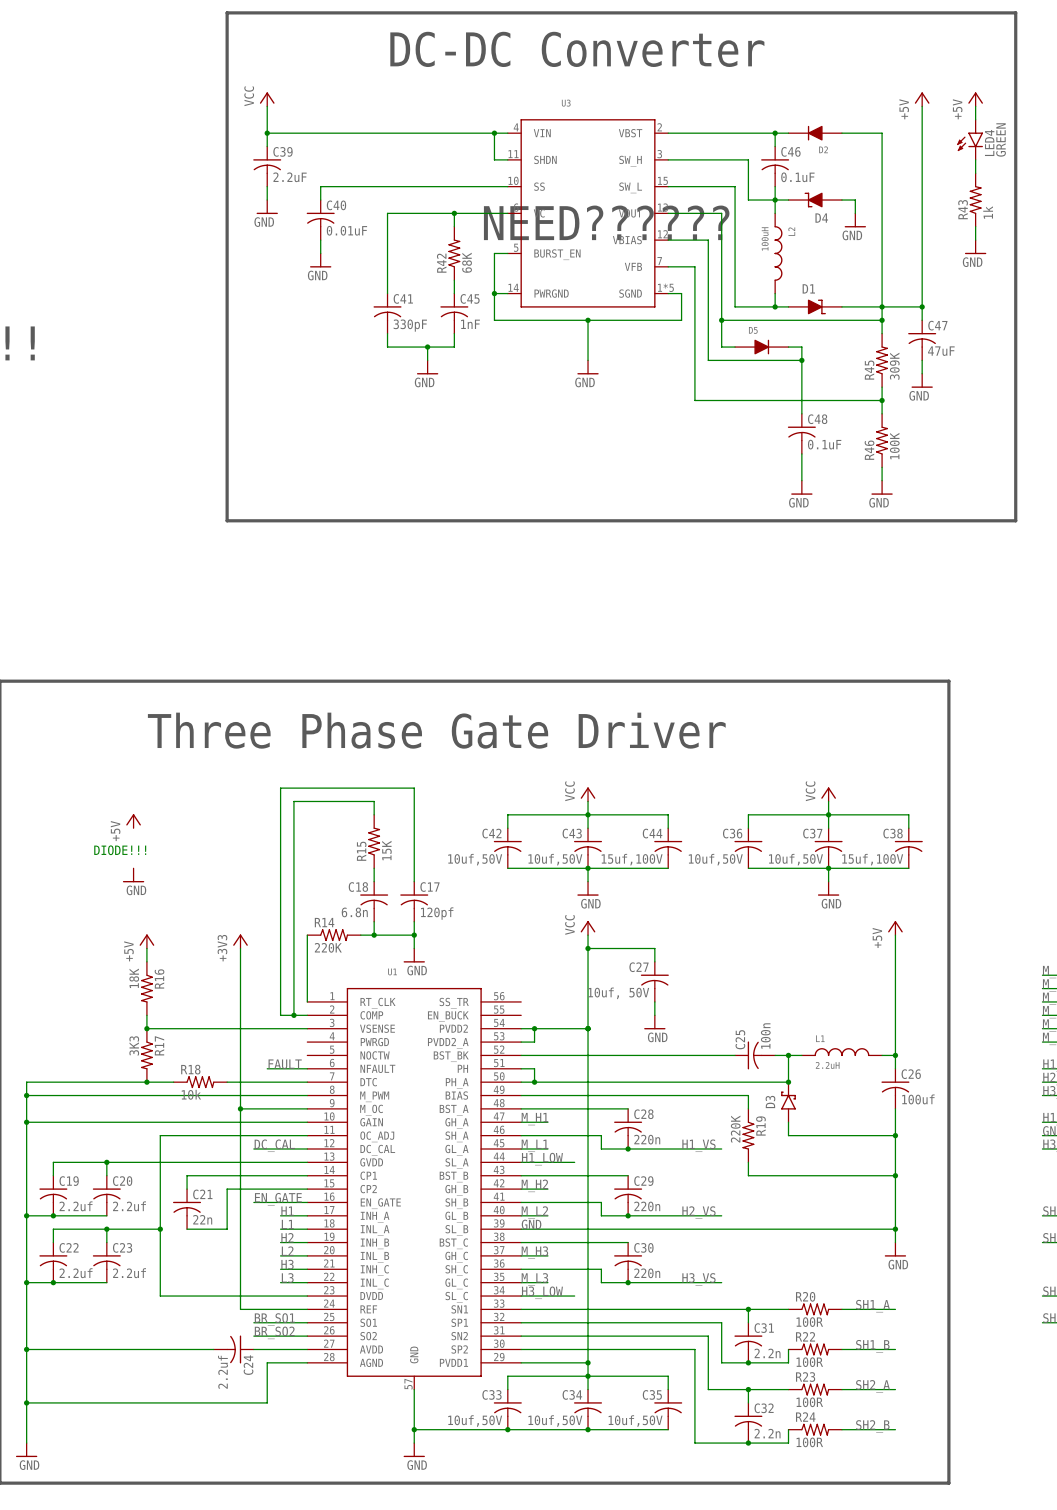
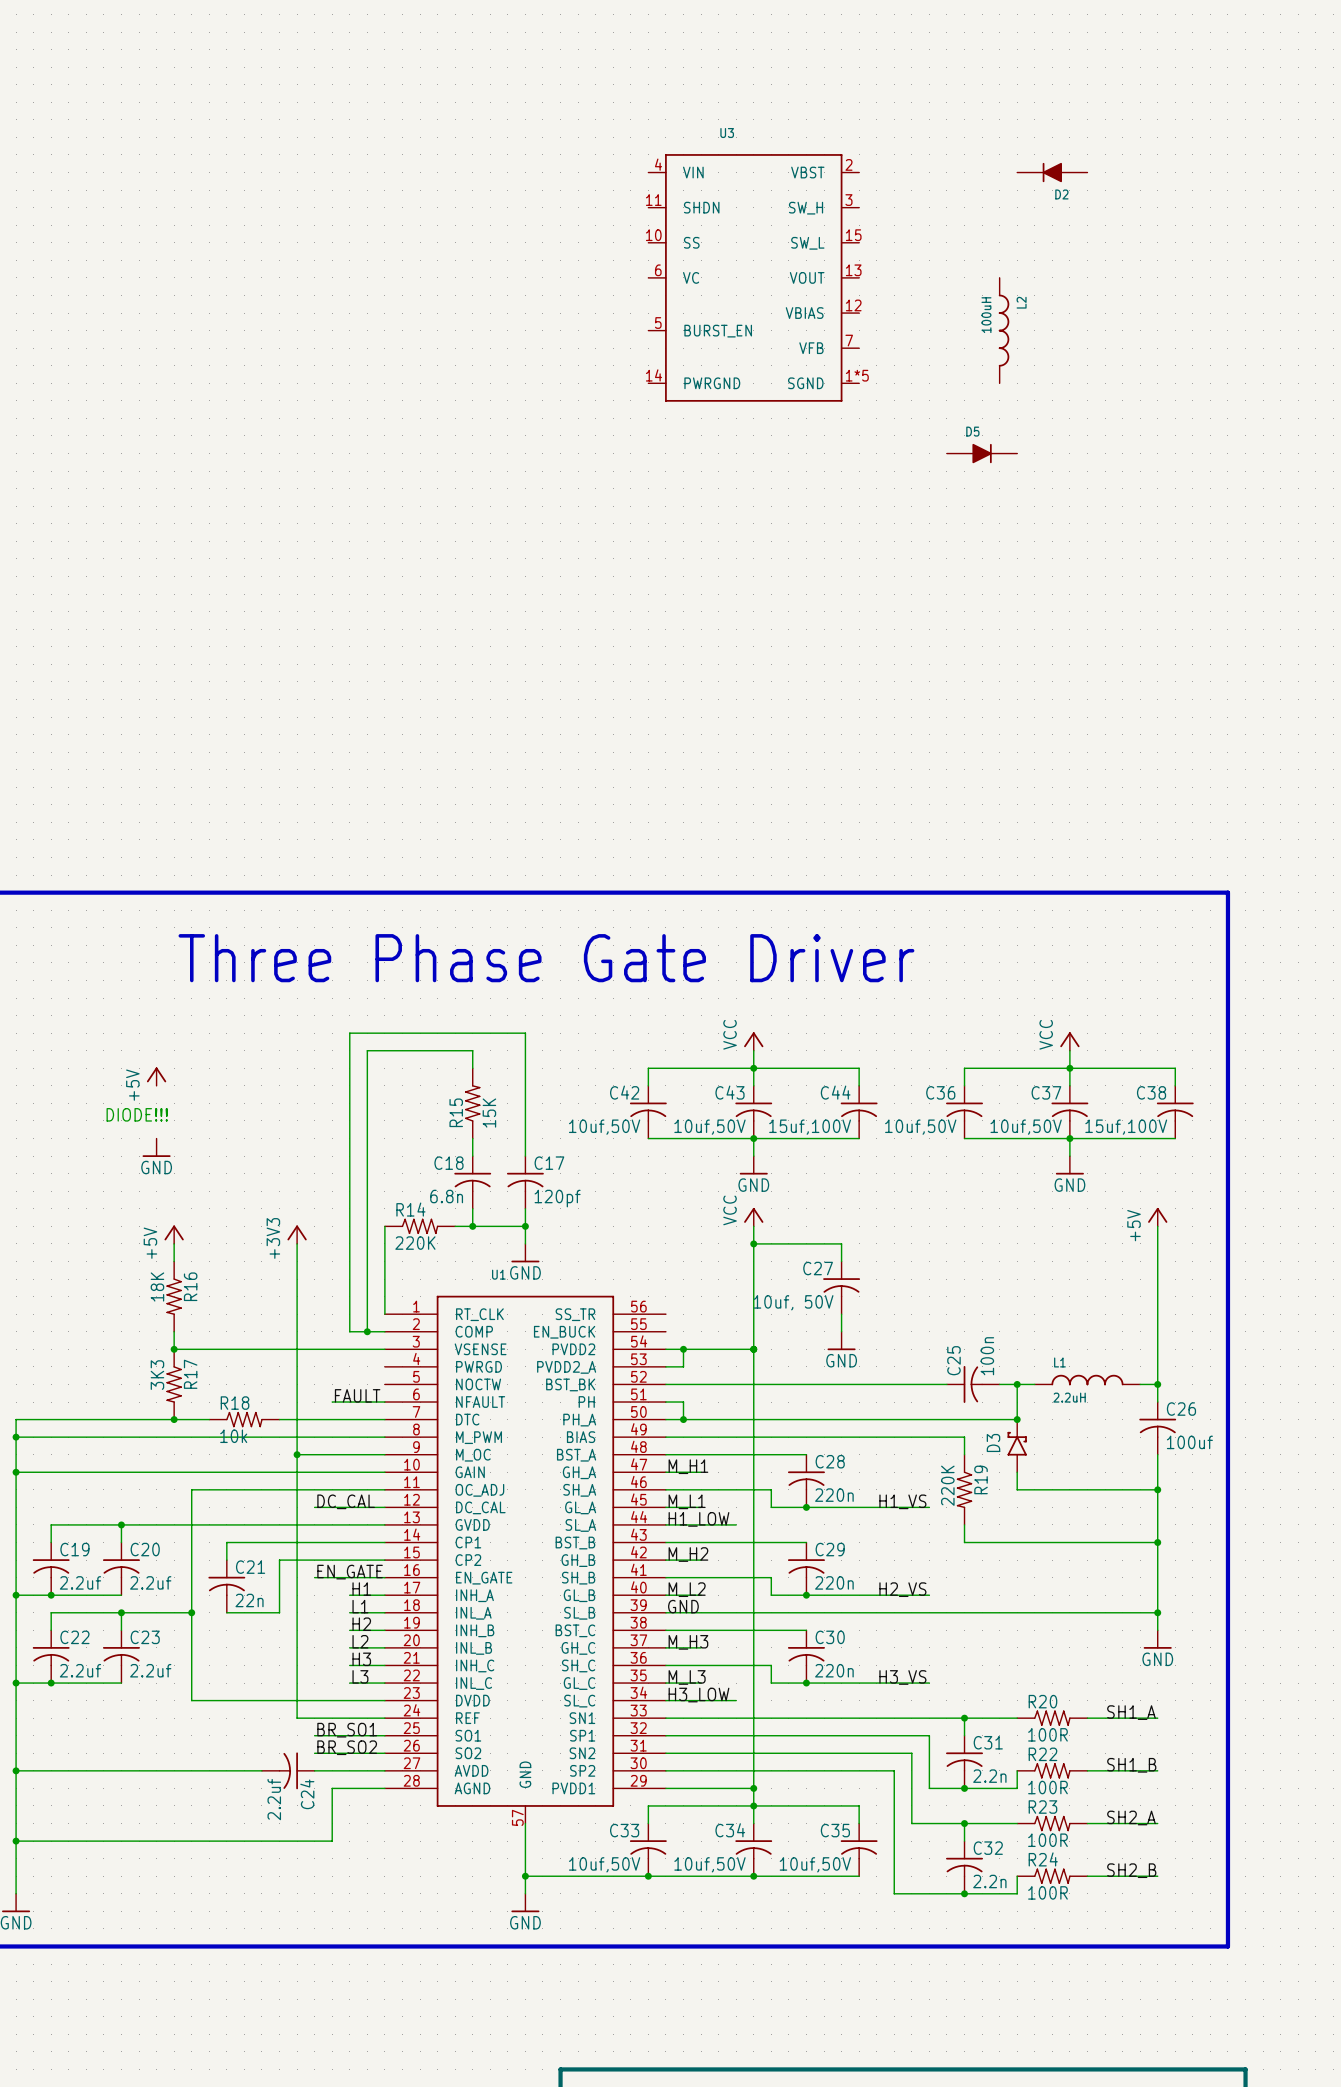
line: (227, 12) (1015, 12) (1015, 520) (227, 520) (227, 12) -> none
text: DC-DC Converter (577, 49) -> none
power symbol: VCC (267, 99) -> none
power symbol: +5V (922, 99) -> none
power symbol: +5V (975, 99) -> none
wire: (267, 106) (267, 146) -> none
wire: (922, 106) (922, 320) -> none
wire: (975, 106) (975, 119) -> none
wire: (267, 133) (507, 133) -> none
junction: (267, 133) -> none
wire: (494, 133) (494, 159) (507, 159) -> none
junction: (494, 133) -> none
wire: (668, 133) (788, 133) -> none
wire: (775, 133) (775, 146) -> none
junction: (775, 133) -> none
wire: (841, 133) (882, 133) (882, 333) -> none
LED4: GREEN (970, 139) -> none
wire: (668, 159) (748, 159) (748, 200) (788, 200) -> none
wire: (975, 159) (975, 173) -> none
C39: 2.2uF (267, 166) -> none
C46: 0.1uF (775, 166) -> none
wire: (267, 186) (267, 200) -> none
wire: (507, 186) (320, 186) (320, 200) -> none
wire: (668, 186) (735, 186) (735, 306) (788, 306) -> none
wire: (775, 186) (775, 213) -> none
junction: (775, 200) -> none
D4: (815, 200) -> none
wire: (841, 200) (855, 200) (855, 213) -> none
R43: 1k (975, 200) -> none
power symbol: GND (267, 207) -> none
wire: (454, 213) (454, 226) -> none
junction: (454, 213) -> none
wire: (507, 213) (387, 213) (387, 293) -> none
wire: (668, 213) (721, 213) (721, 347) (735, 347) -> none
C40: 0.01uF (320, 220) -> none
power symbol: GND (855, 220) -> none
text: NEED?????? (606, 222) -> none
wire: (975, 226) (975, 240) -> none
wire: (320, 240) (320, 253) -> none
wire: (668, 240) (708, 240) (708, 360) (801, 360) -> none
power symbol: GND (975, 247) -> none
R42: 68K (454, 253) -> none
wire: (507, 253) (494, 253) (494, 320) (681, 320) (681, 293) (668, 293) -> none
power symbol: GND (320, 260) -> none
wire: (668, 266) (694, 266) (694, 400) (882, 400) -> none
wire: (454, 280) (454, 293) -> none
wire: (494, 293) (507, 293) -> none
junction: (494, 293) -> none
wire: (775, 293) (775, 306) -> none
junction: (775, 306) -> none
D1: (815, 306) -> none
wire: (841, 306) (922, 306) -> none
junction: (882, 306) -> none
junction: (922, 306) -> none
C41: 330pF (387, 313) -> none
C45: 1nF (454, 313) -> none
wire: (588, 320) (588, 360) -> none
junction: (588, 320) -> none
wire: (721, 320) (882, 320) -> none
junction: (721, 320) -> none
junction: (882, 320) -> none
wire: (387, 333) (387, 347) (454, 347) (454, 333) -> none
C47: 47uF (922, 340) -> none
wire: (427, 347) (427, 360) -> none
junction: (427, 347) -> none
wire: (788, 347) (801, 347) (801, 413) -> none
junction: (801, 360) -> none
R45: 309K (882, 360) -> none
wire: (922, 360) (922, 373) -> none
power symbol: GND (427, 367) -> none
power symbol: GND (588, 367) -> none
power symbol: GND (922, 380) -> none
wire: (882, 387) (882, 413) -> none
junction: (882, 400) -> none
C48: 0.1uF (801, 433) -> none
R46: 100K (882, 440) -> none
wire: (801, 453) (801, 480) -> none
wire: (882, 467) (882, 480) -> none
power symbol: GND (801, 487) -> none
power symbol: GND (882, 487) -> none

